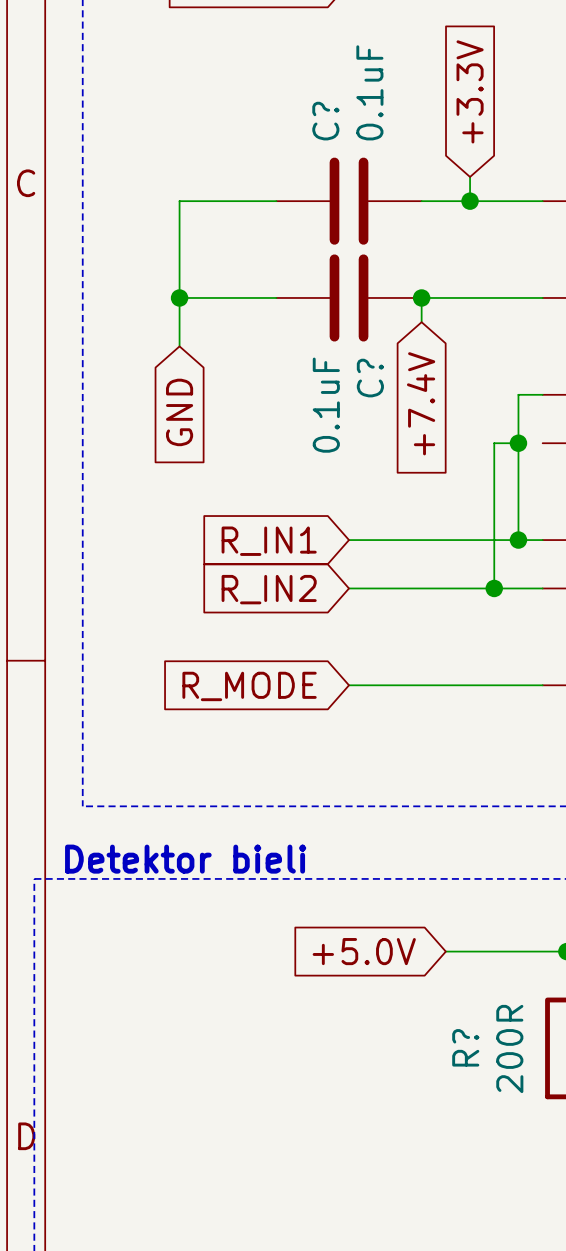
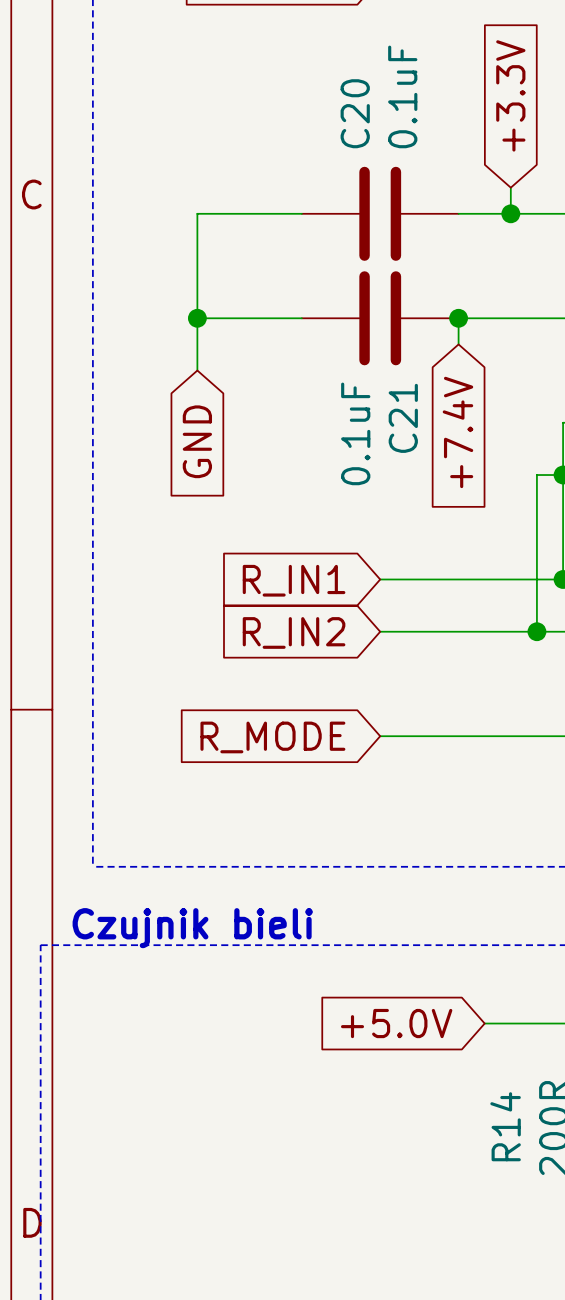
C? name: C? (325, 121) -> C20 (355, 113)
C? name: C? (370, 378) -> C21 (403, 418)
text: Detektor bieli (185, 859) -> Czujnik bieli (192, 928)
R? name: R? (465, 1047) -> R14 (505, 1126)

